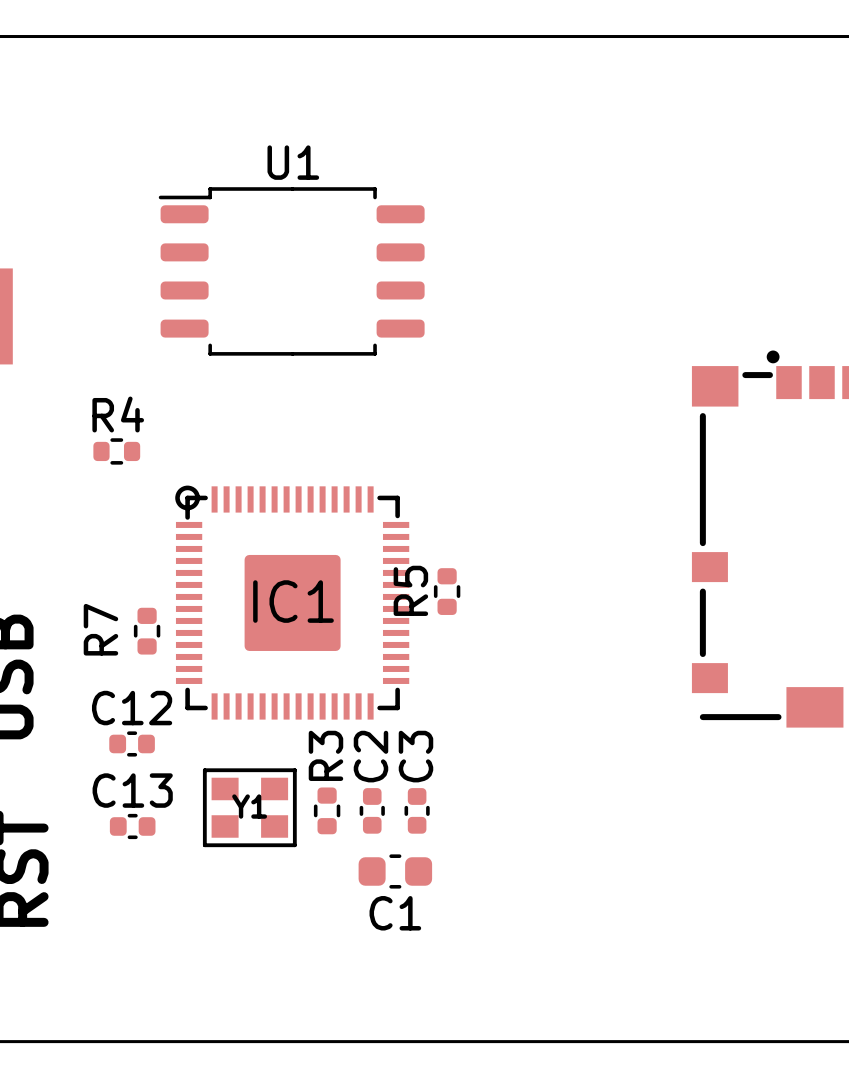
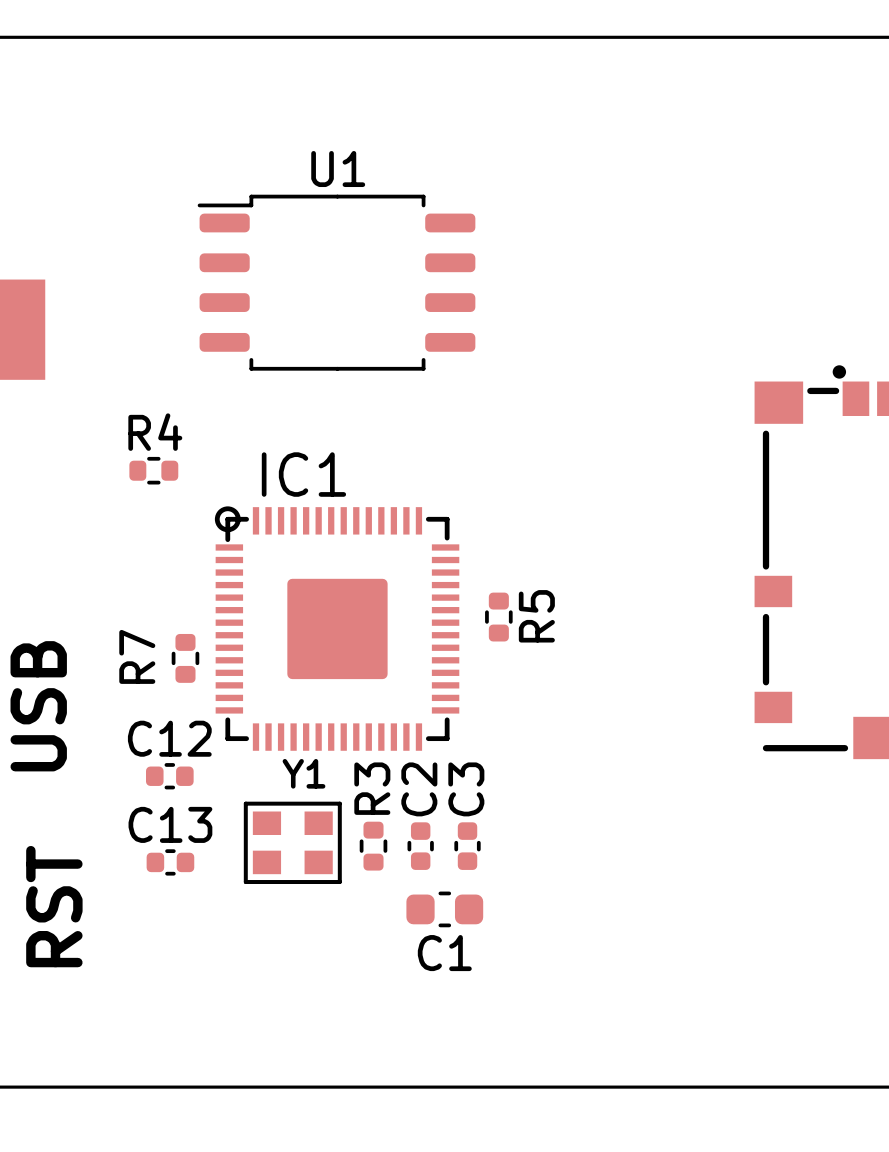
R5 name position: R5 (410, 590) -> R5 (536, 616)
IC1 name position: IC1 (293, 601) -> IC1 (303, 474)
Y1 name position: Y1 (249, 806) -> Y1 (304, 773)

